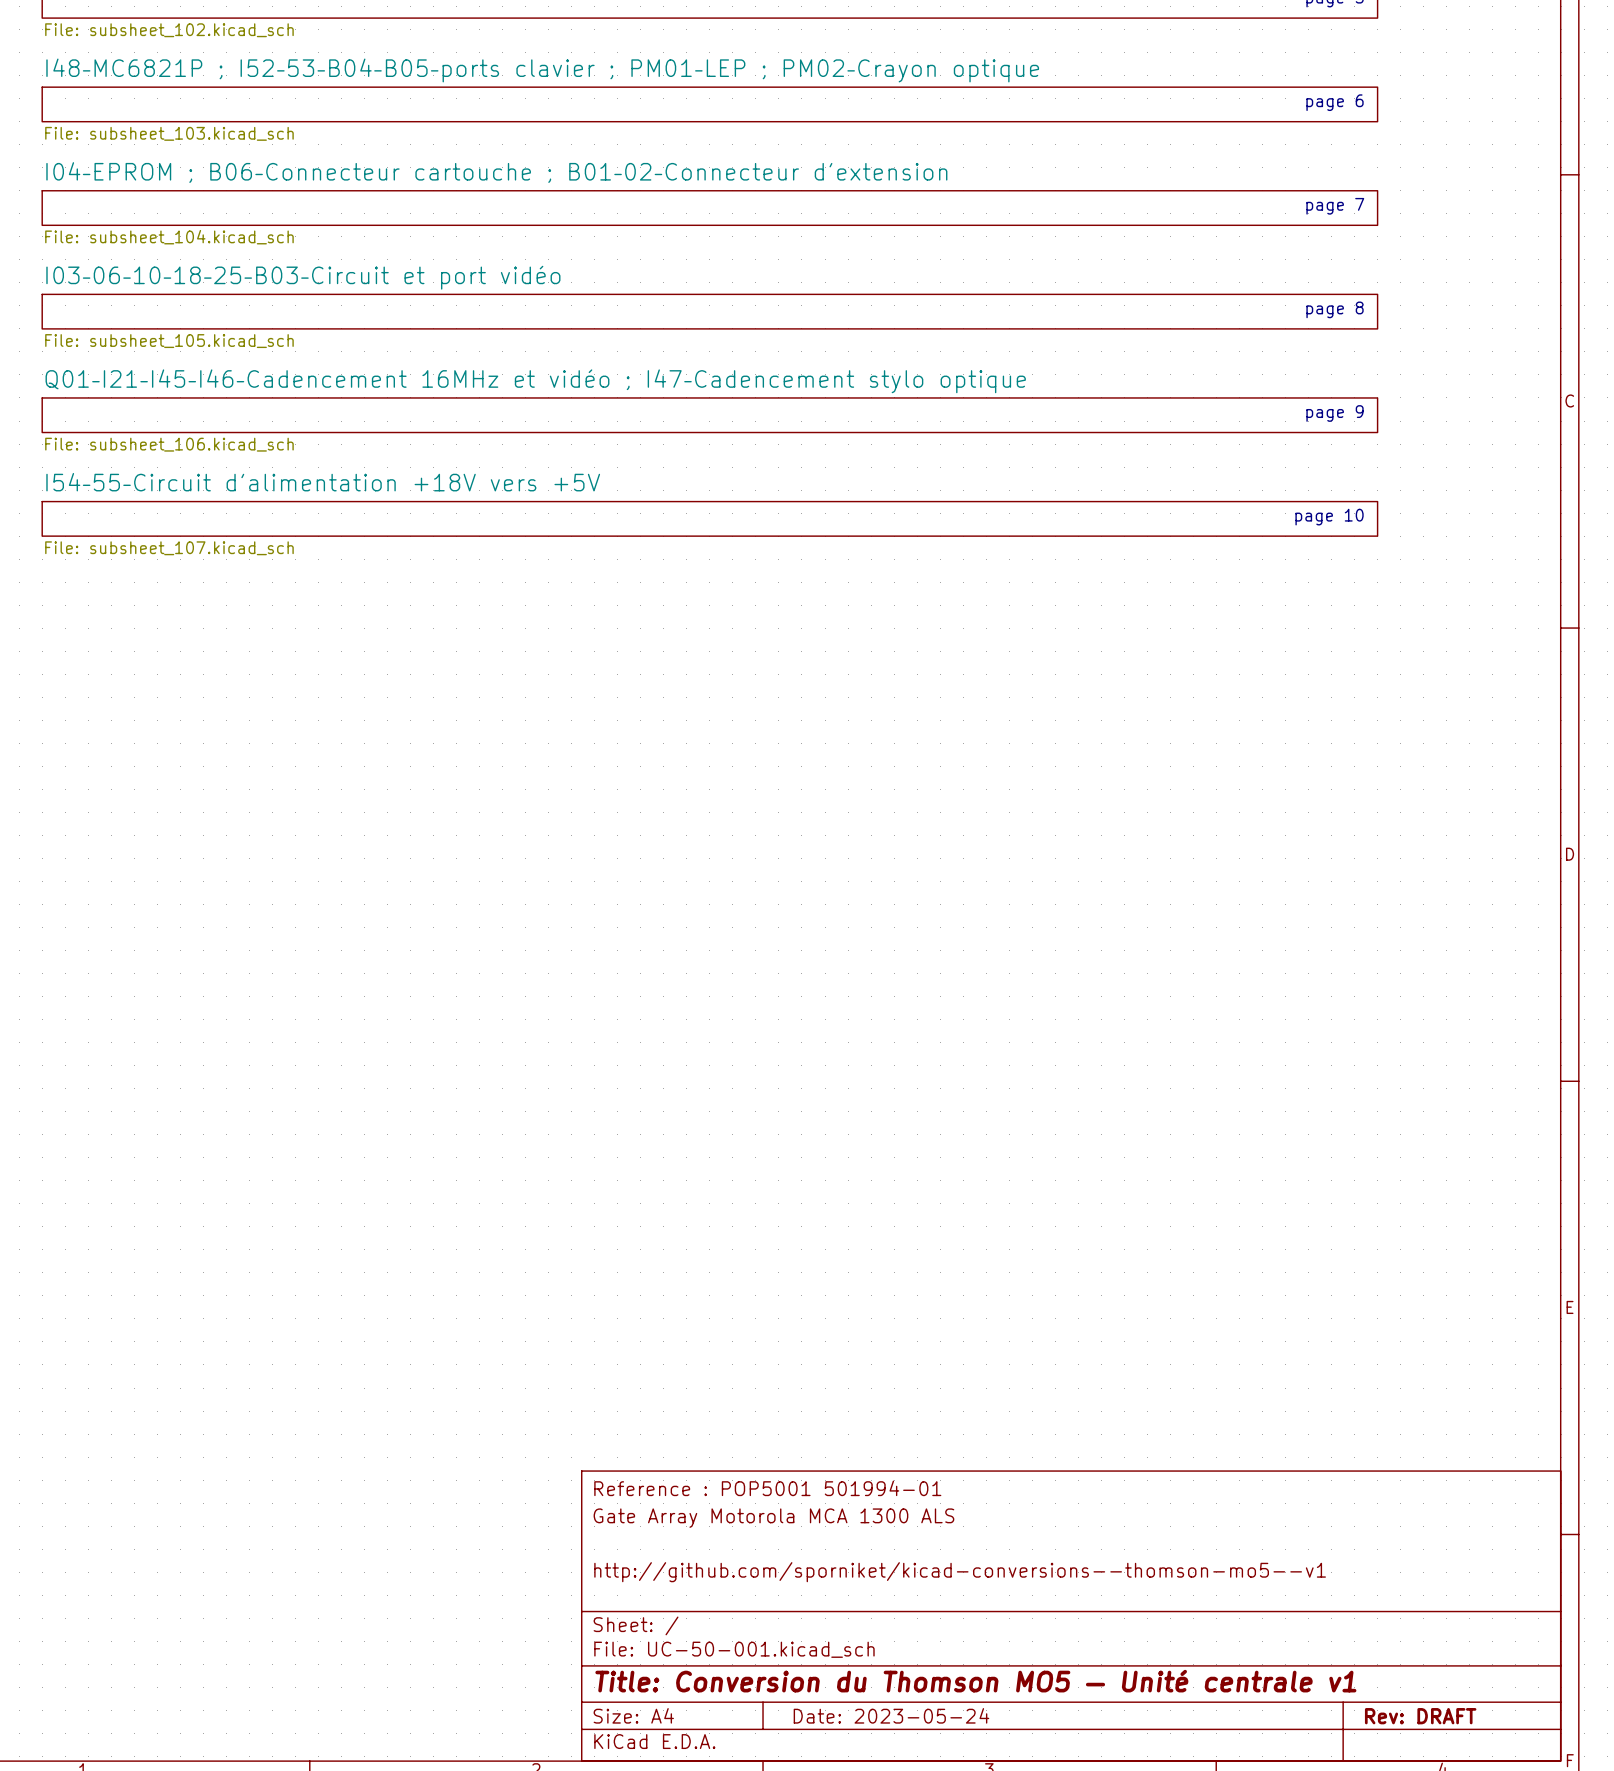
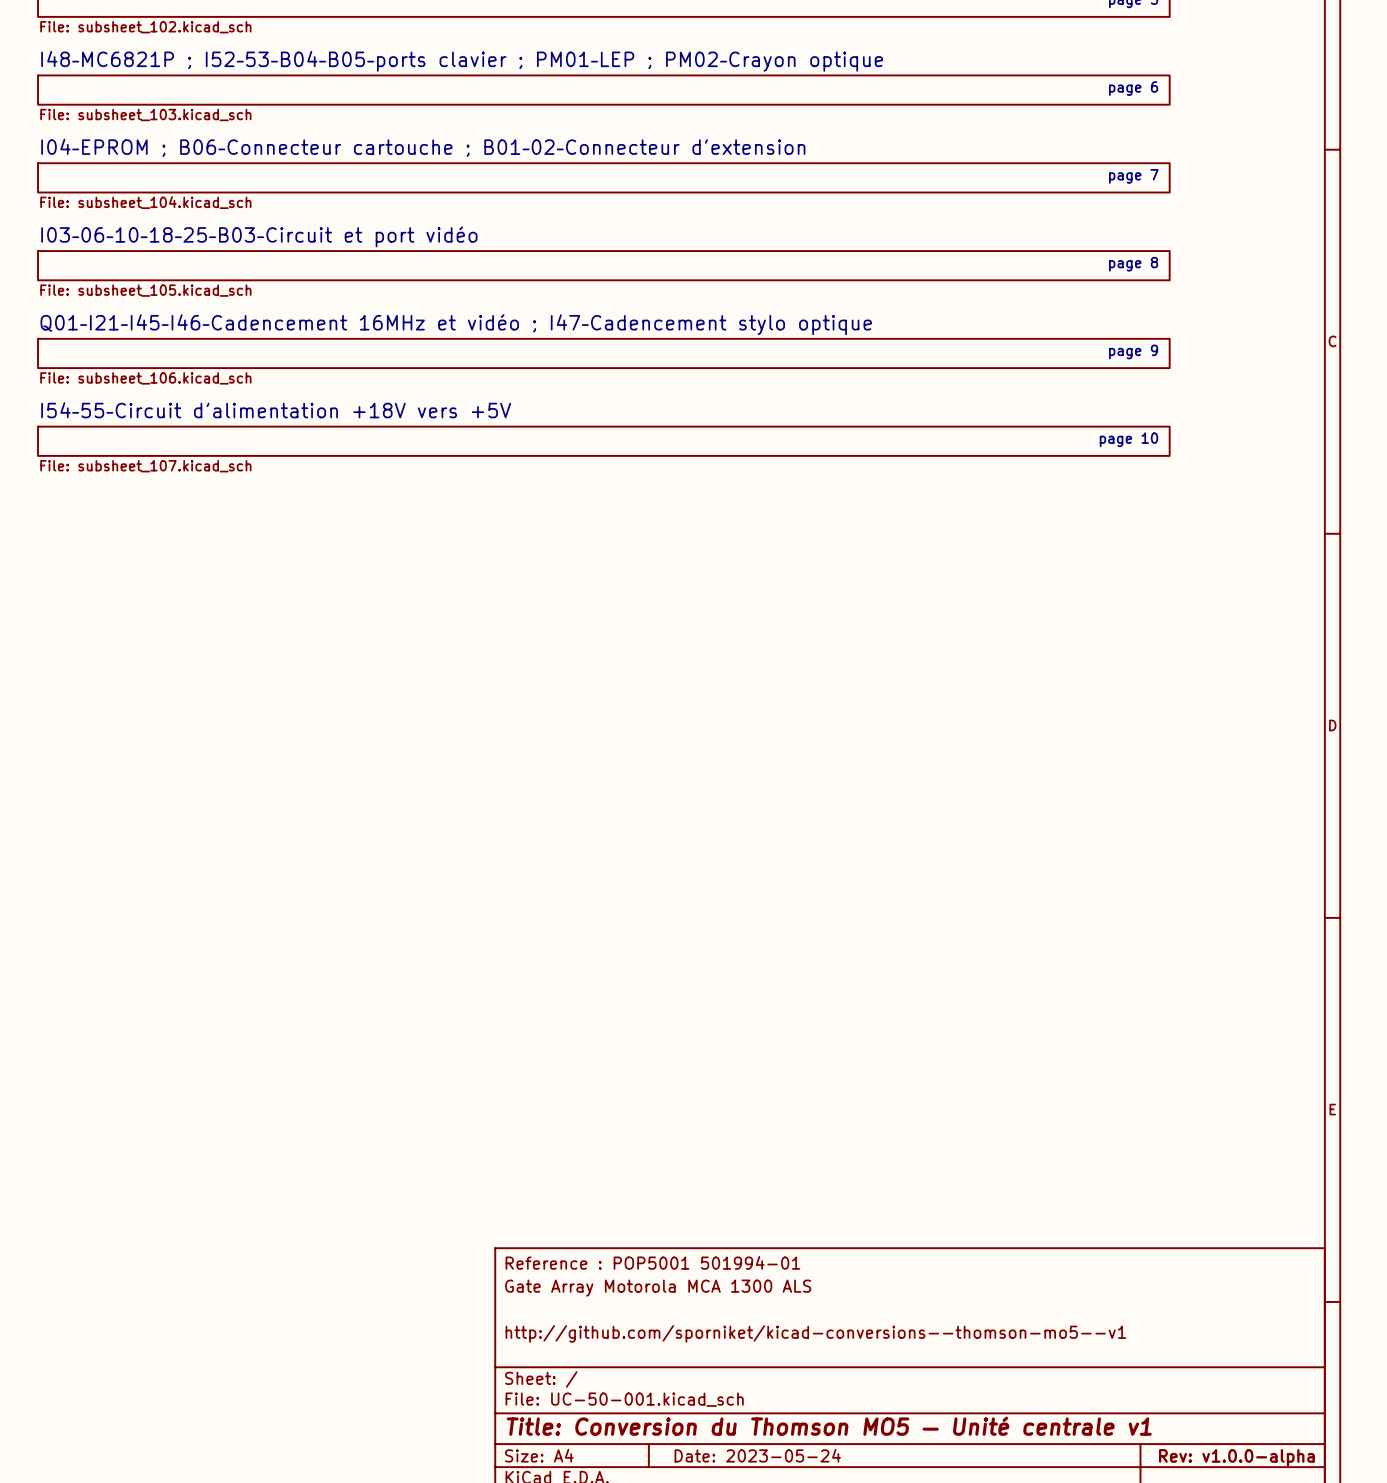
title block: Rev: DRAFT (1420, 1716) -> Rev: v1.0.0-alpha (1236, 1457)

